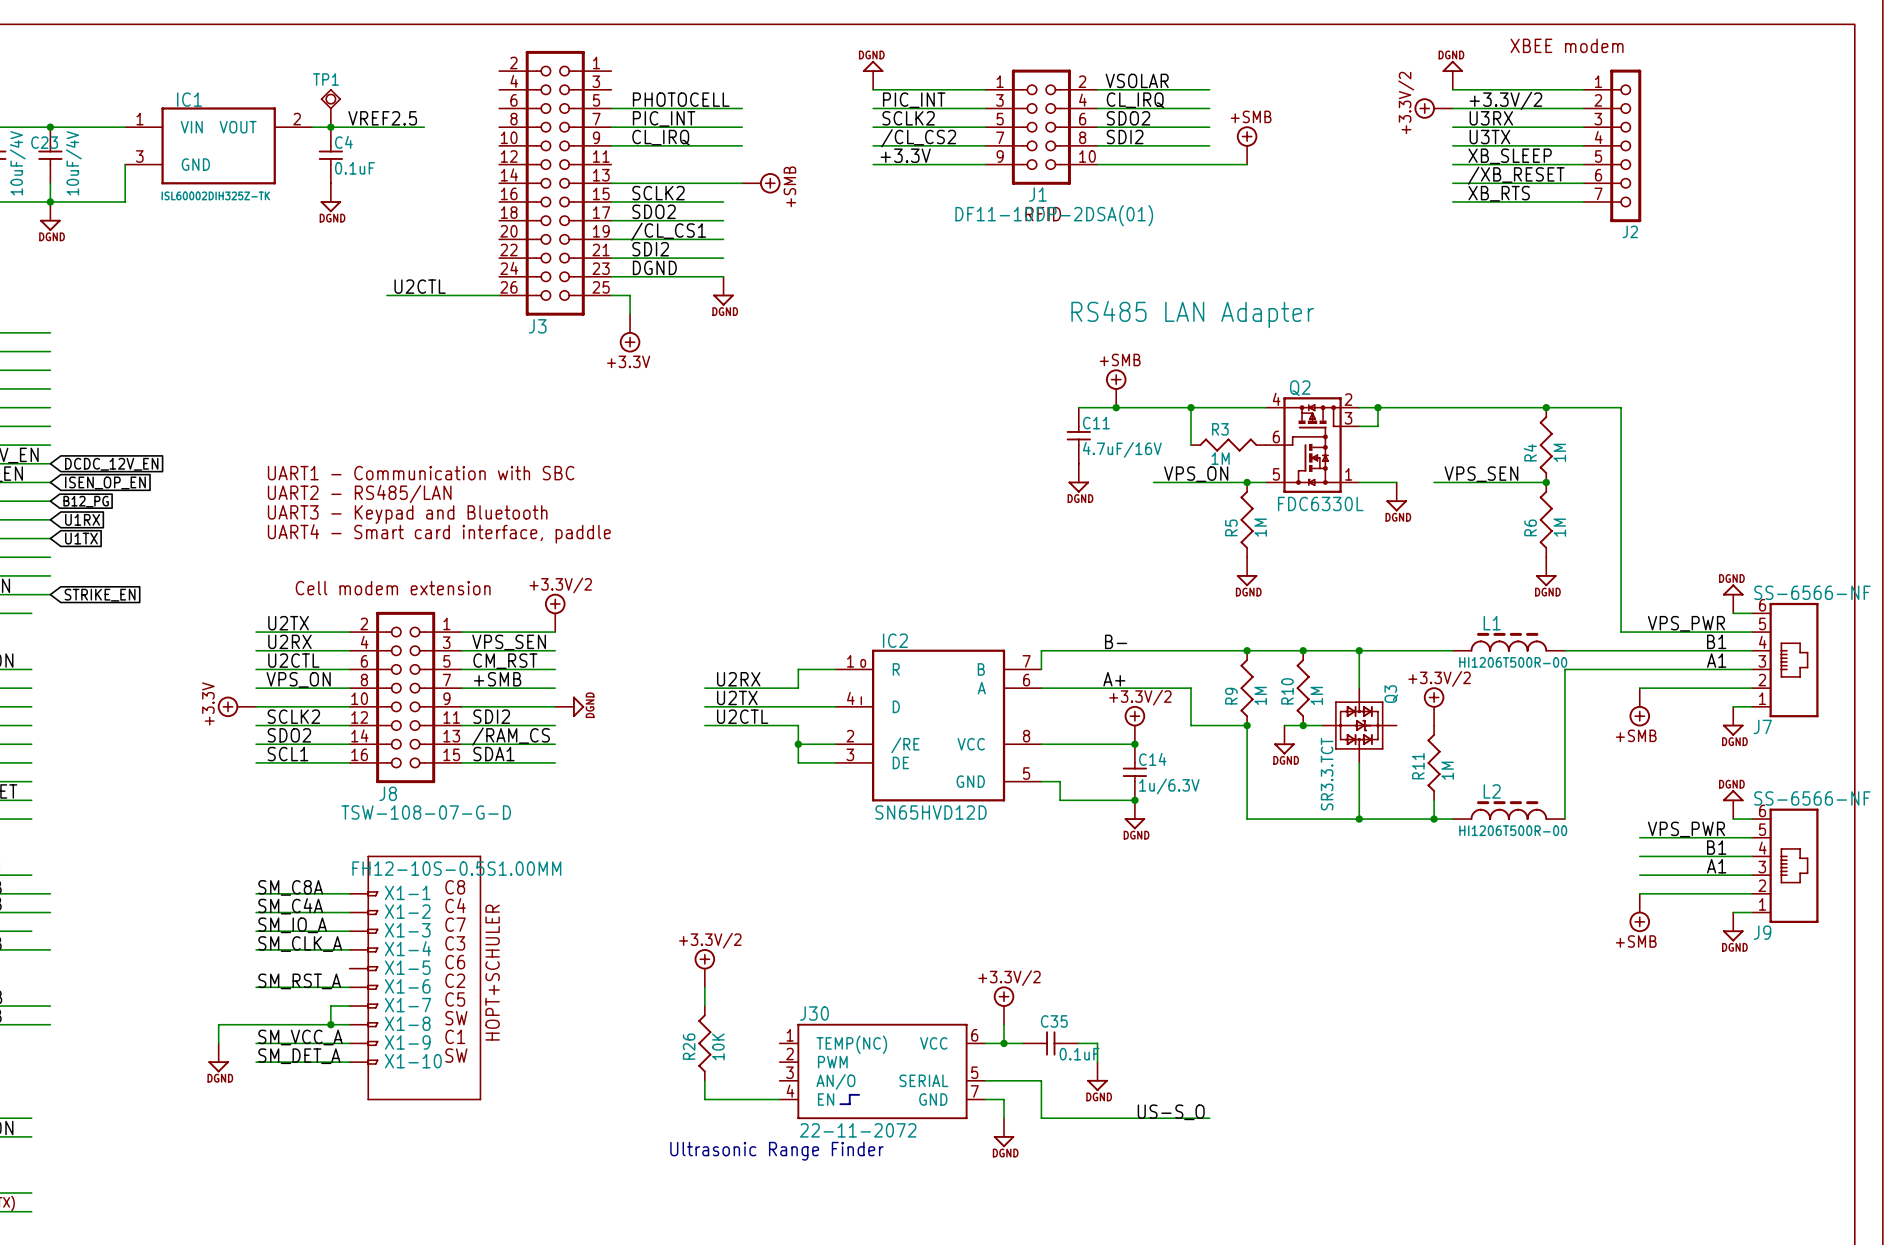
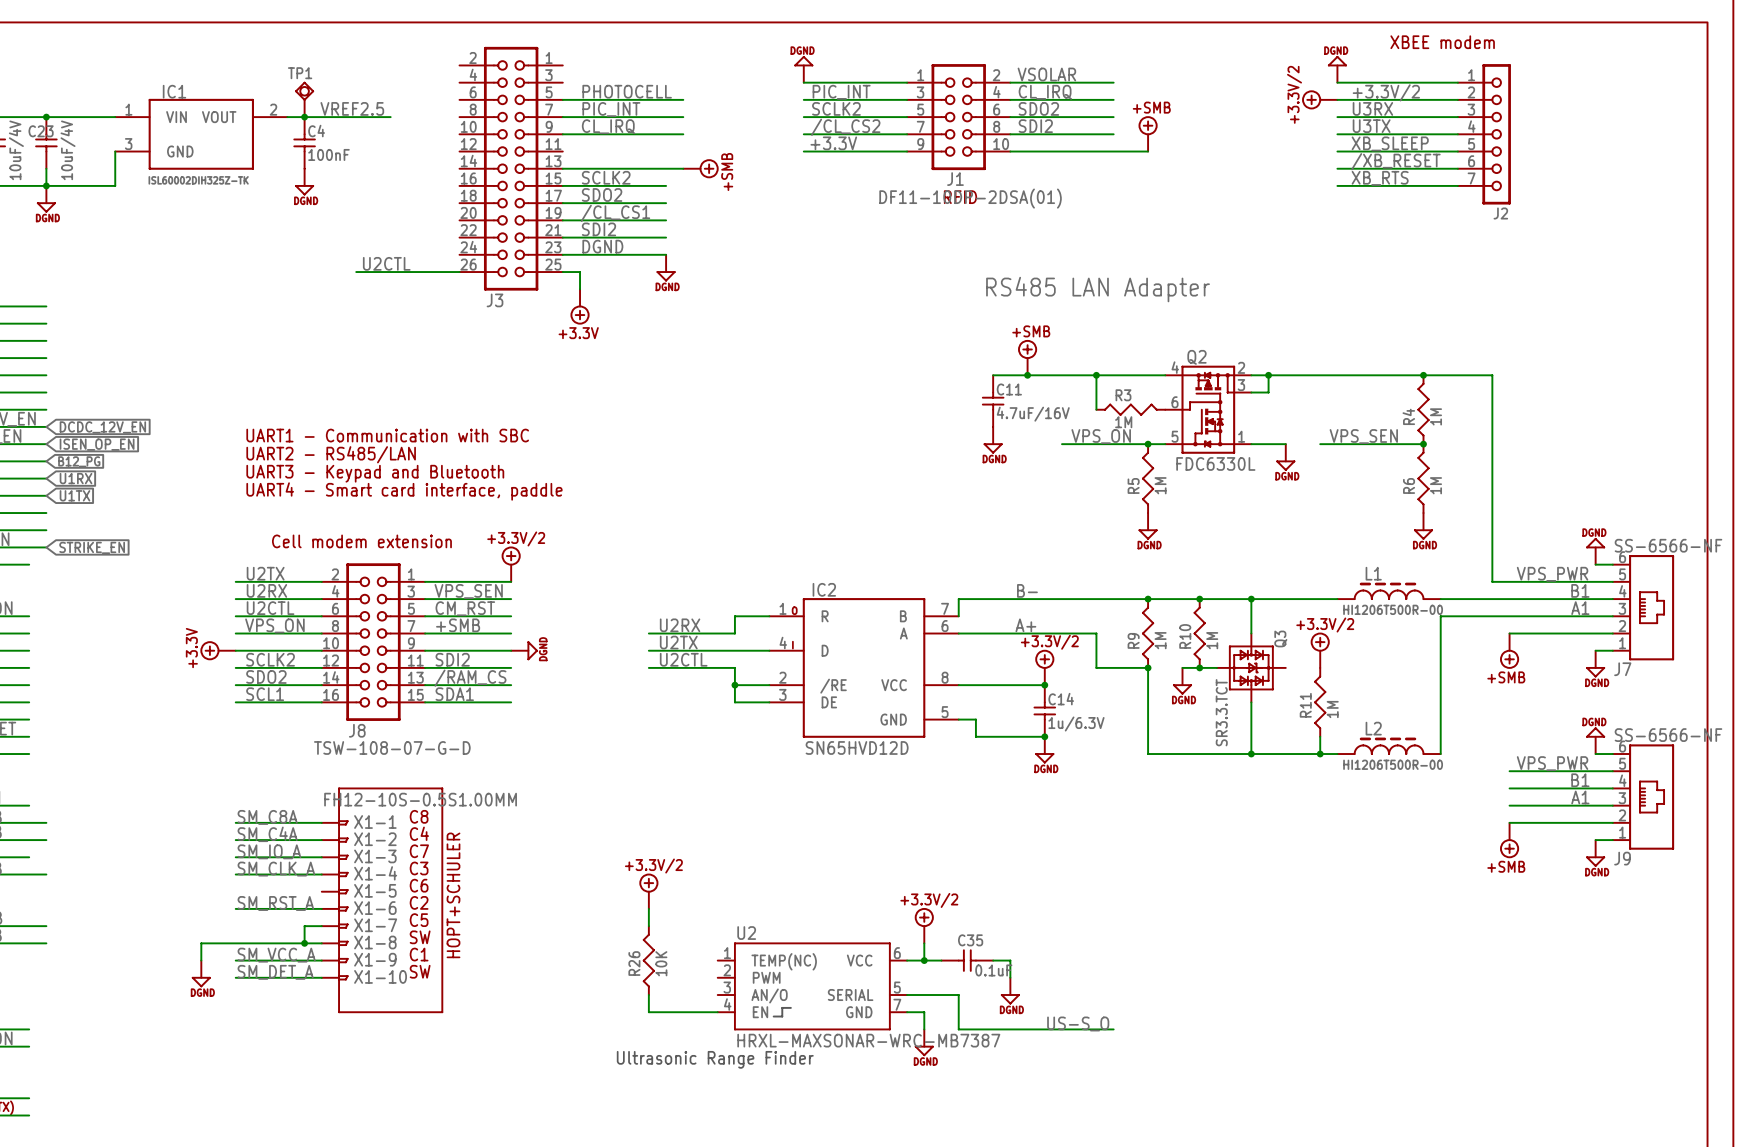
C4 value: 0.1uF (354, 168) -> 100nF (328, 154)
J30 name: J30 (814, 1013) -> U2 (746, 933)
J30 value: 22-11-2072 (858, 1130) -> HRXL-MAXSONAR-WRC-MB7387 (868, 1040)

